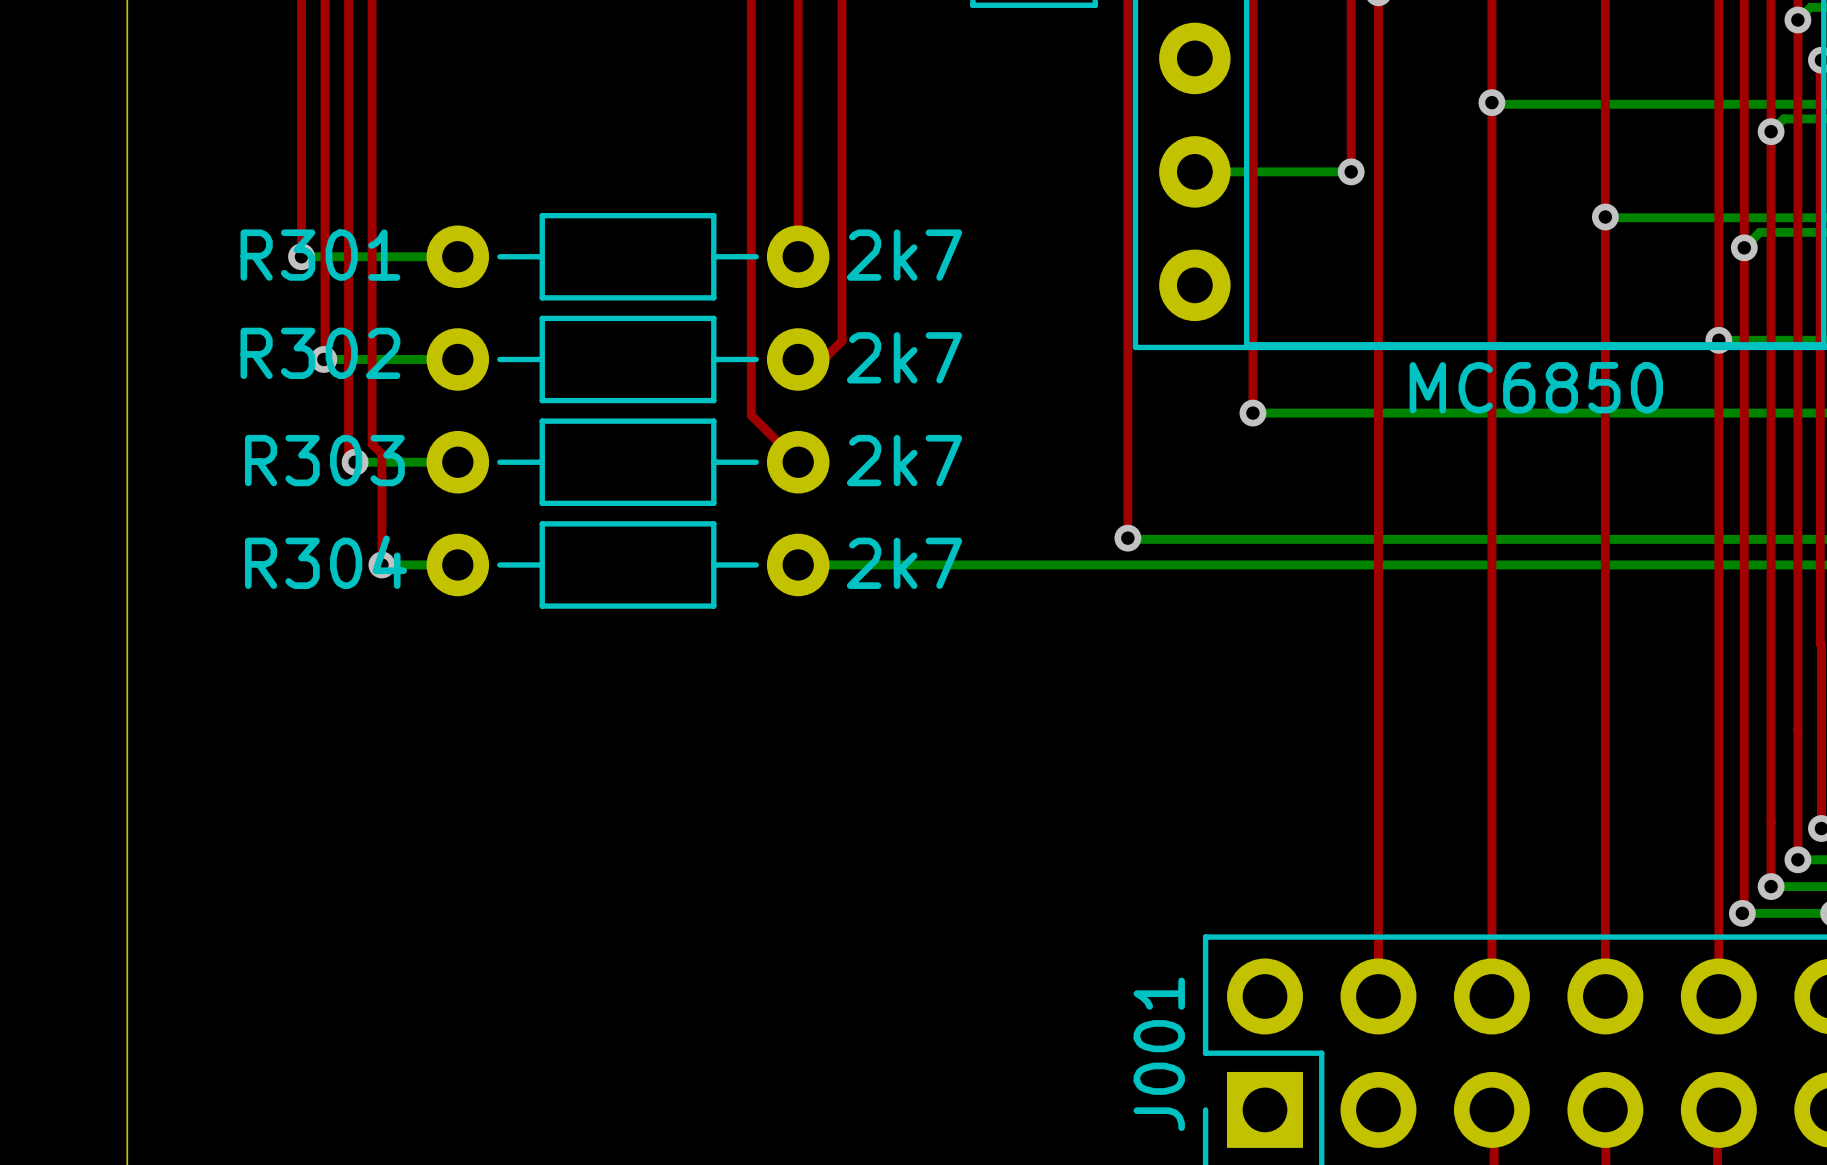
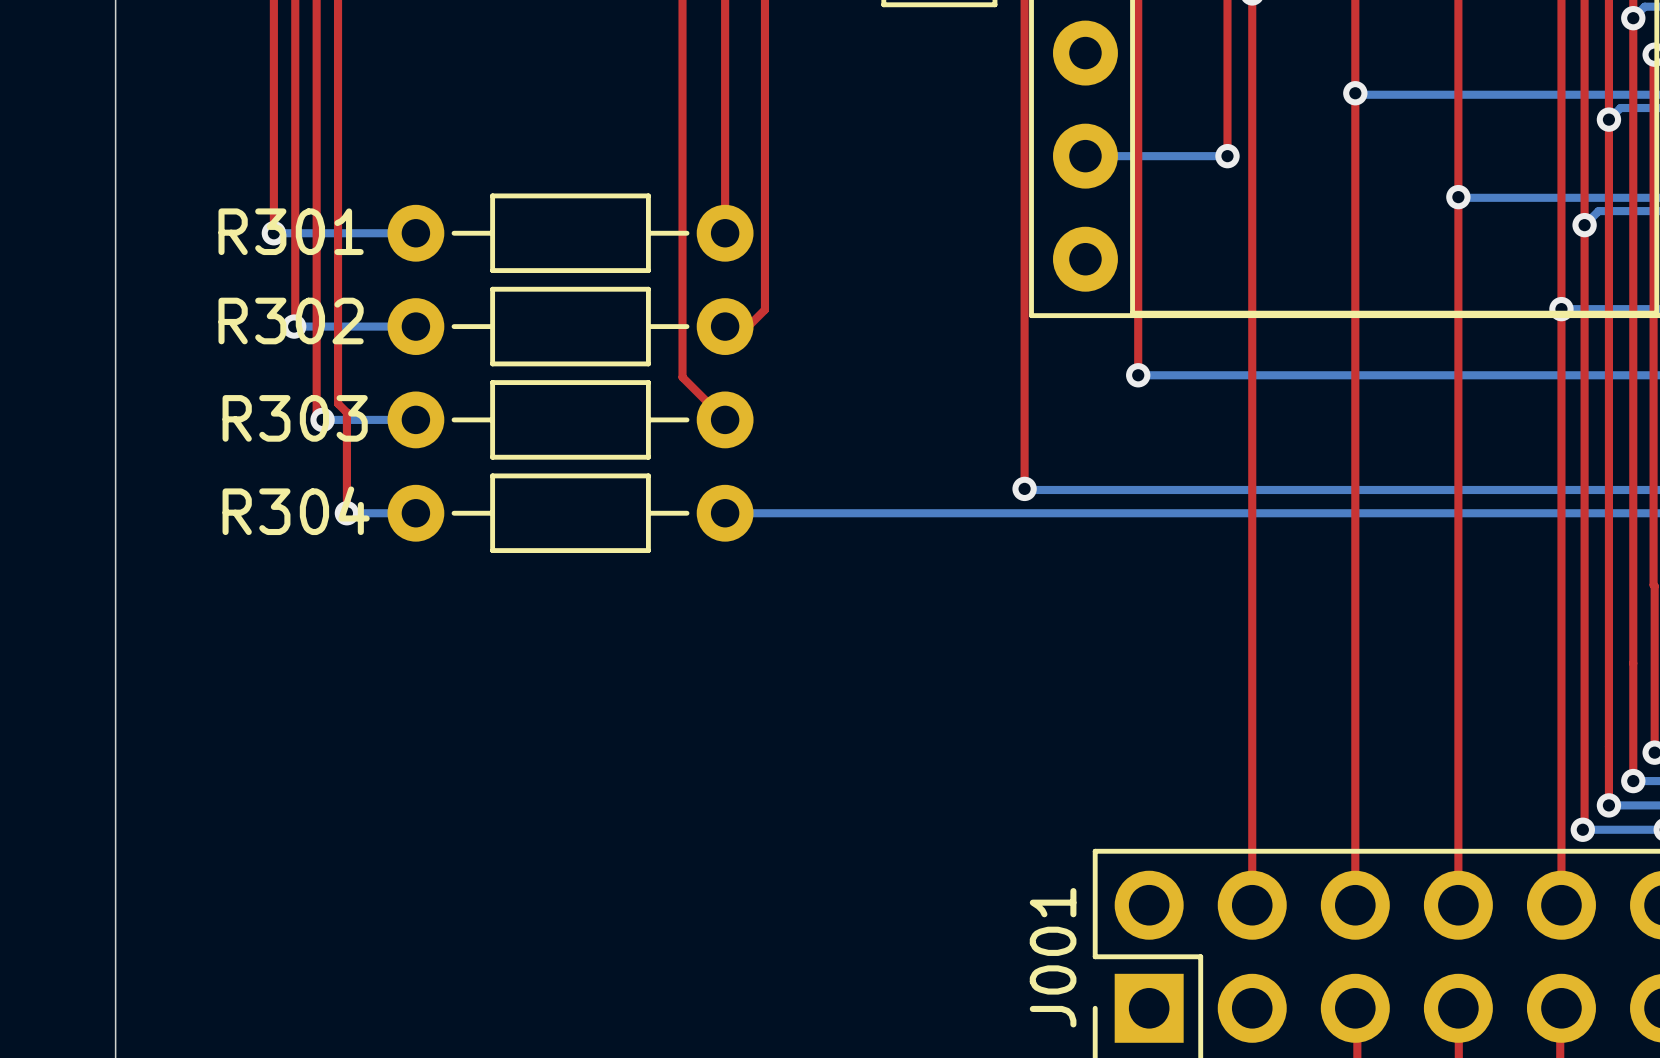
R301 value: 2k7 (904, 255) -> none
R302 value: 2k7 (904, 357) -> none
part value: MC6850 (1536, 387) -> none
R303 value: 2k7 (904, 460) -> none
R304 value: 2k7 (904, 563) -> none

